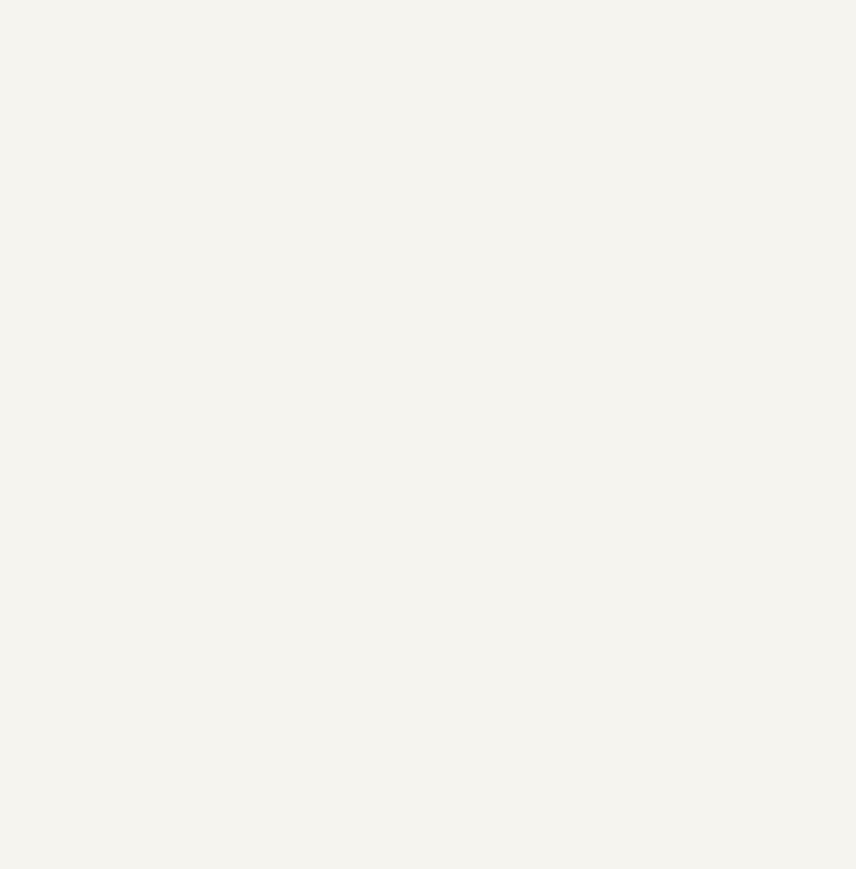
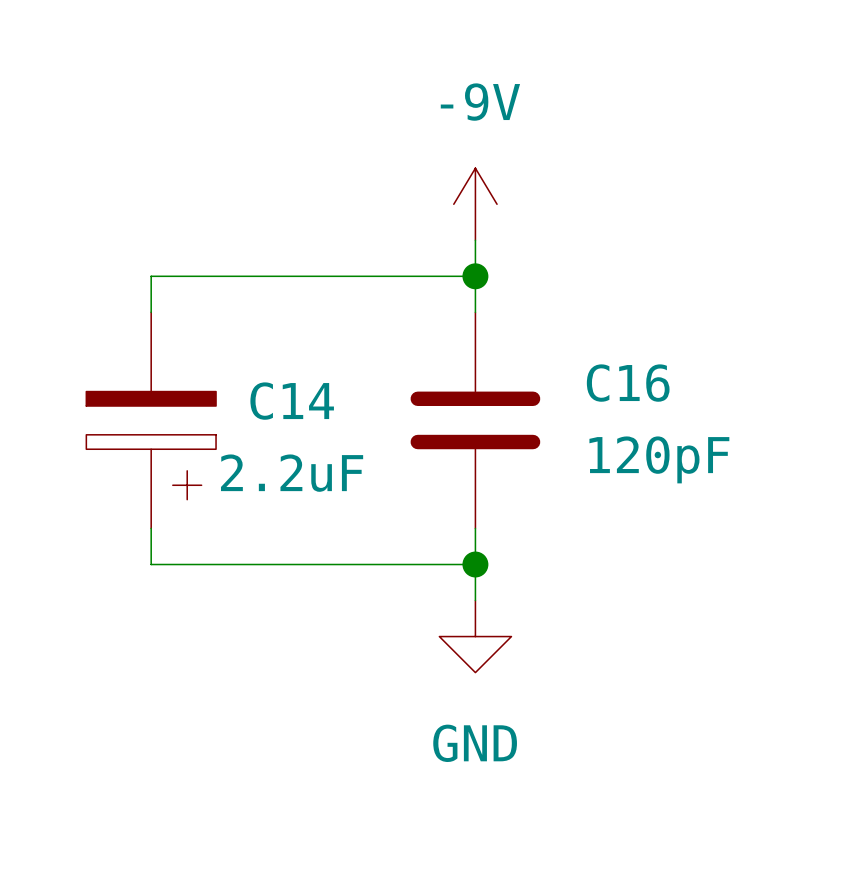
power symbol: none -> -9V (475, 204)
wire: none -> (475, 240) (475, 312)
wire: none -> (475, 276) (151, 276) (151, 312)
junction: none -> (475, 276)
C14: none -> 2.2uF (151, 420)
C16: none -> 120pF (475, 420)
wire: none -> (151, 528) (151, 564) (475, 564)
wire: none -> (475, 528) (475, 600)
junction: none -> (475, 564)
power symbol: none -> GND (475, 636)

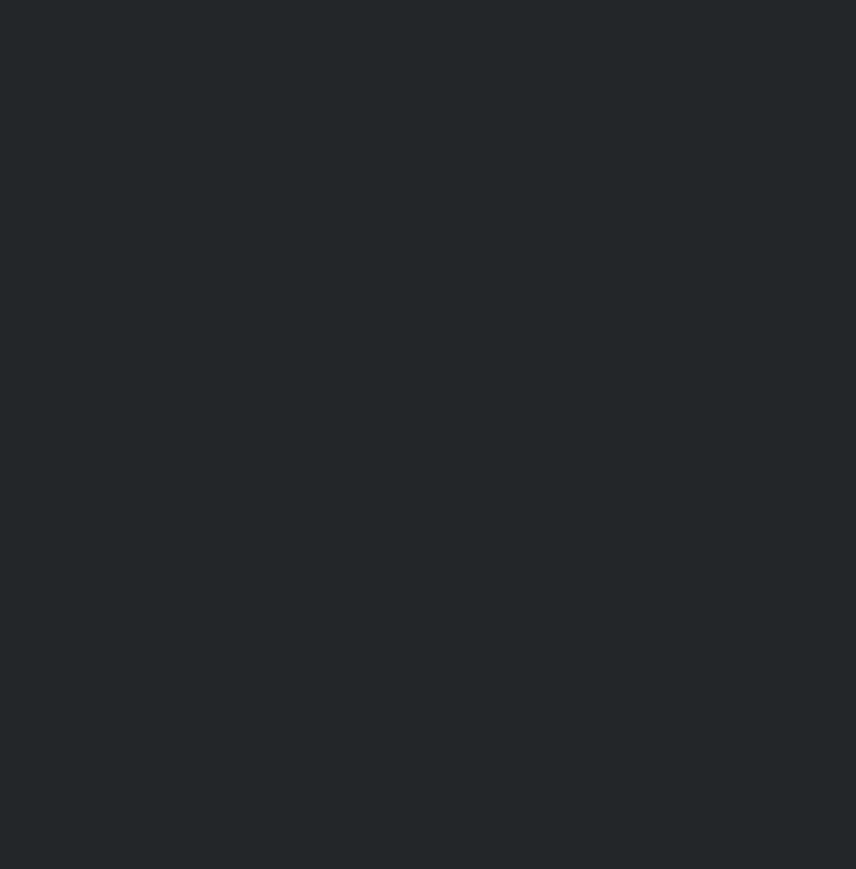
power symbol: -9V (475, 204) -> none
wire: (475, 240) (475, 312) -> none
wire: (475, 276) (151, 276) (151, 312) -> none
junction: (475, 276) -> none
C14: 2.2uF (151, 420) -> none
C16: 120pF (475, 420) -> none
wire: (151, 528) (151, 564) (475, 564) -> none
wire: (475, 528) (475, 600) -> none
junction: (475, 564) -> none
power symbol: GND (475, 636) -> none

